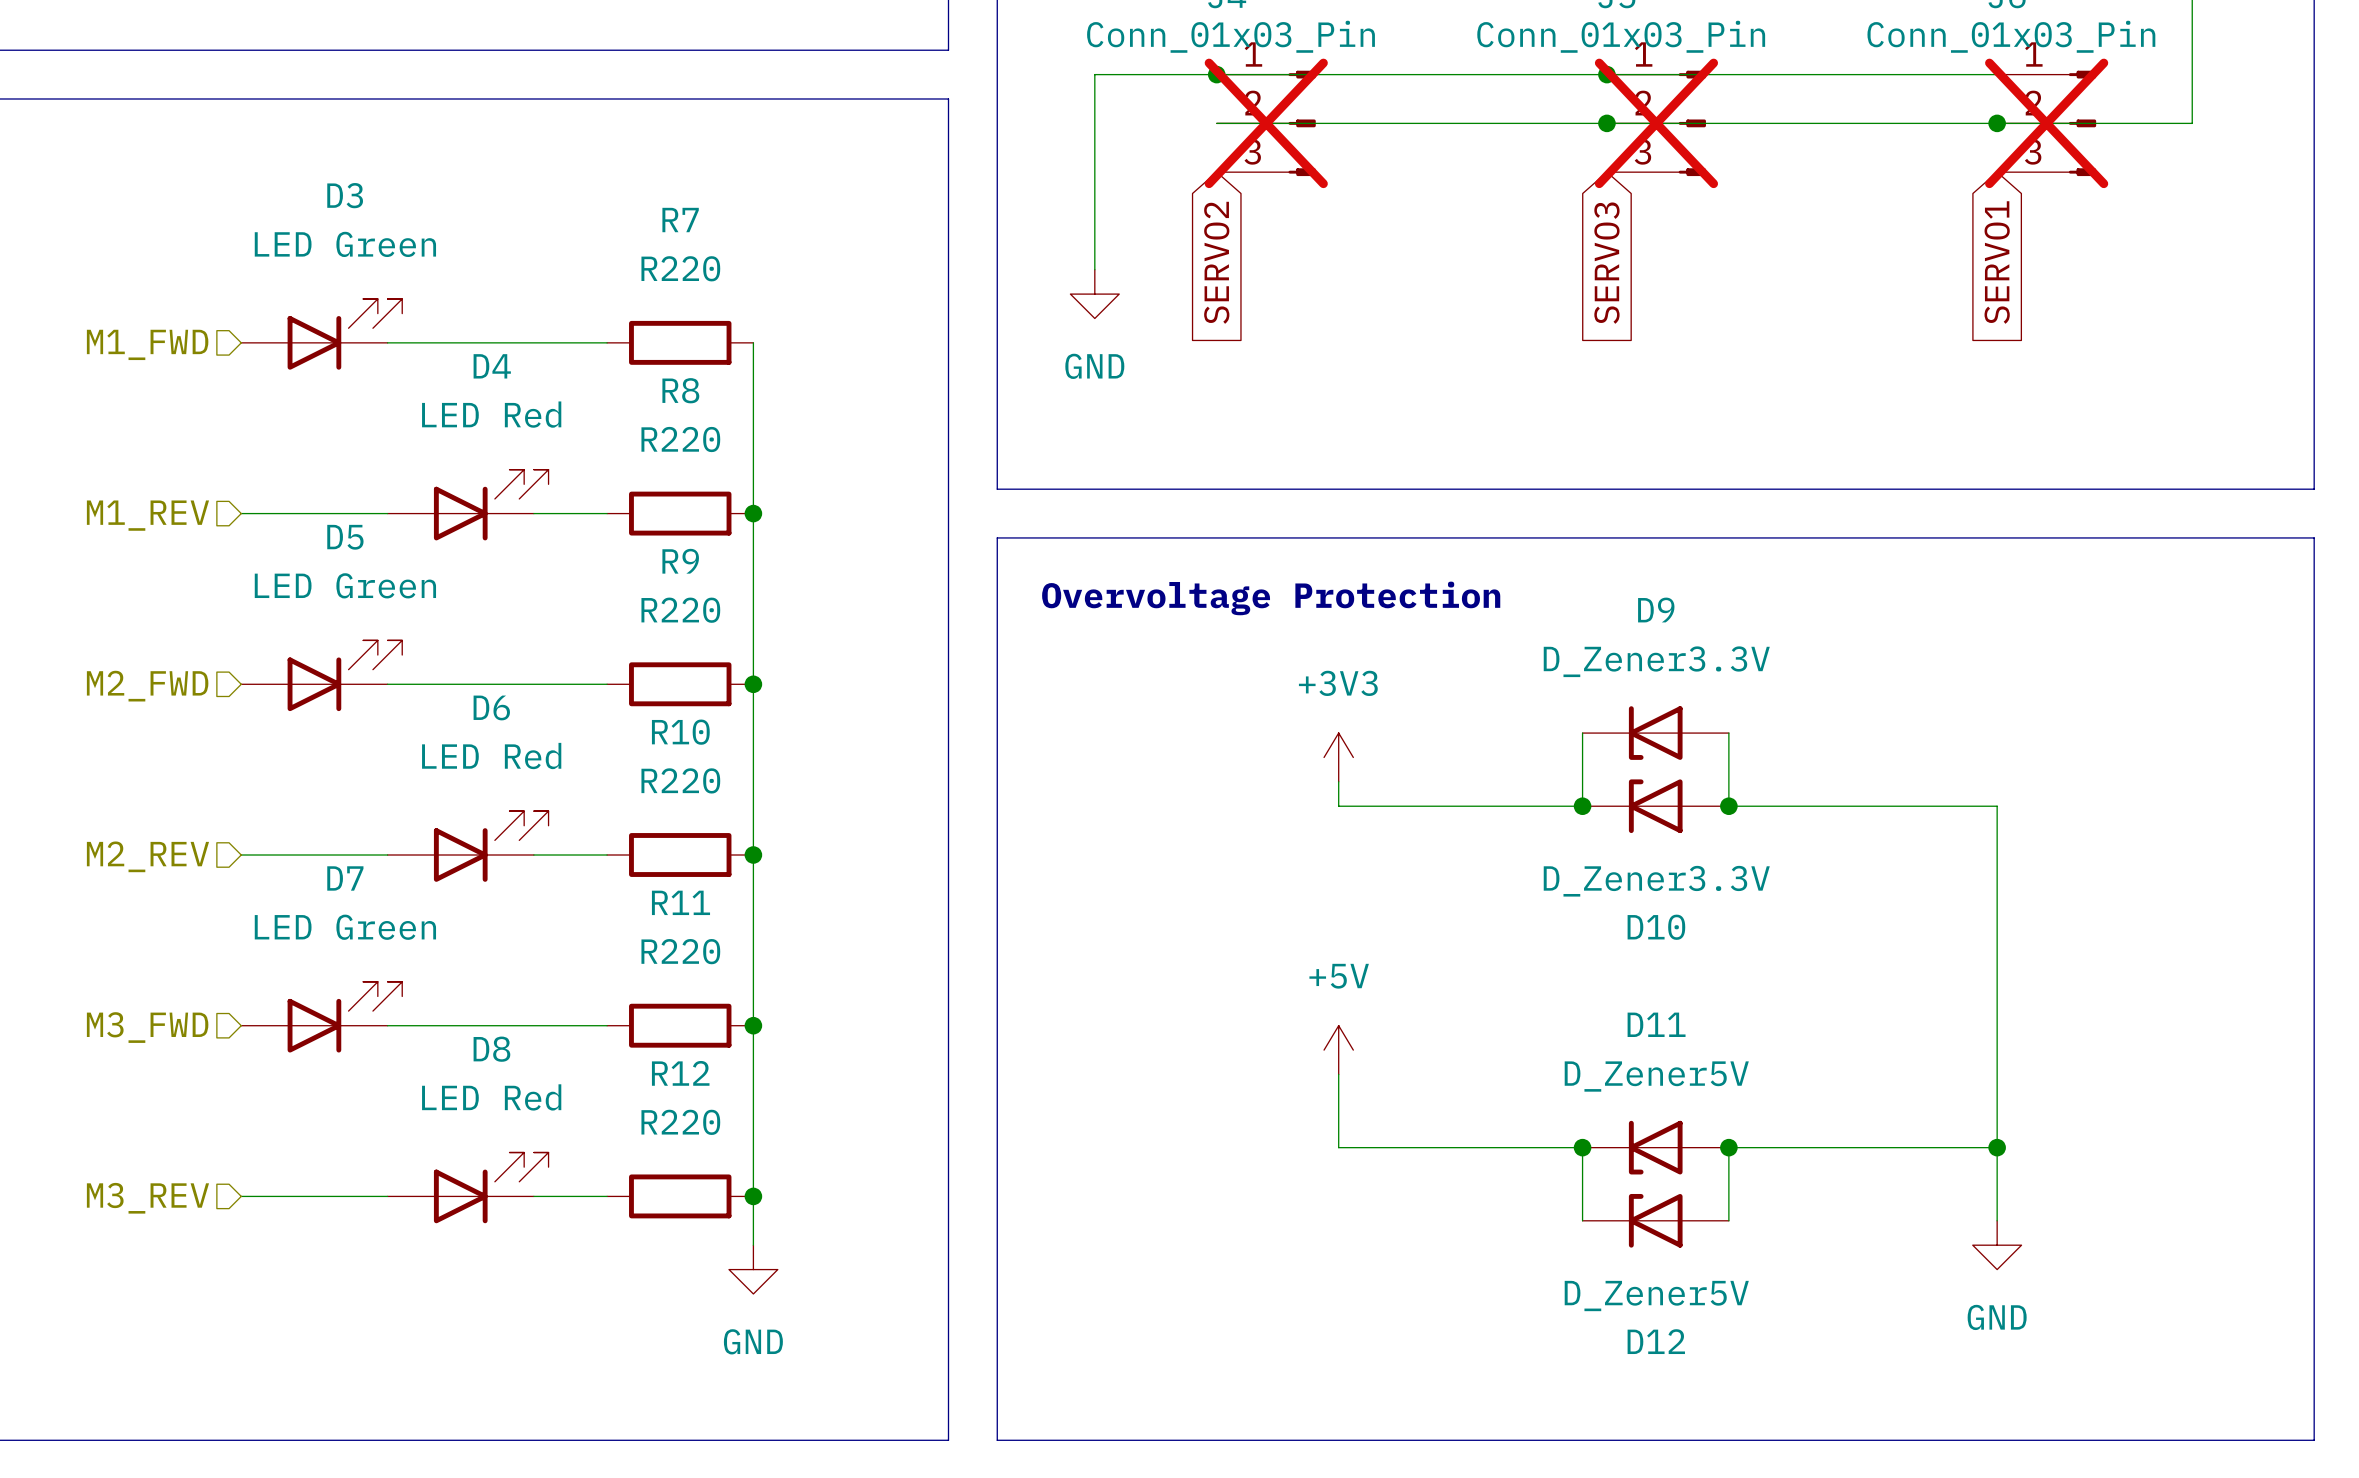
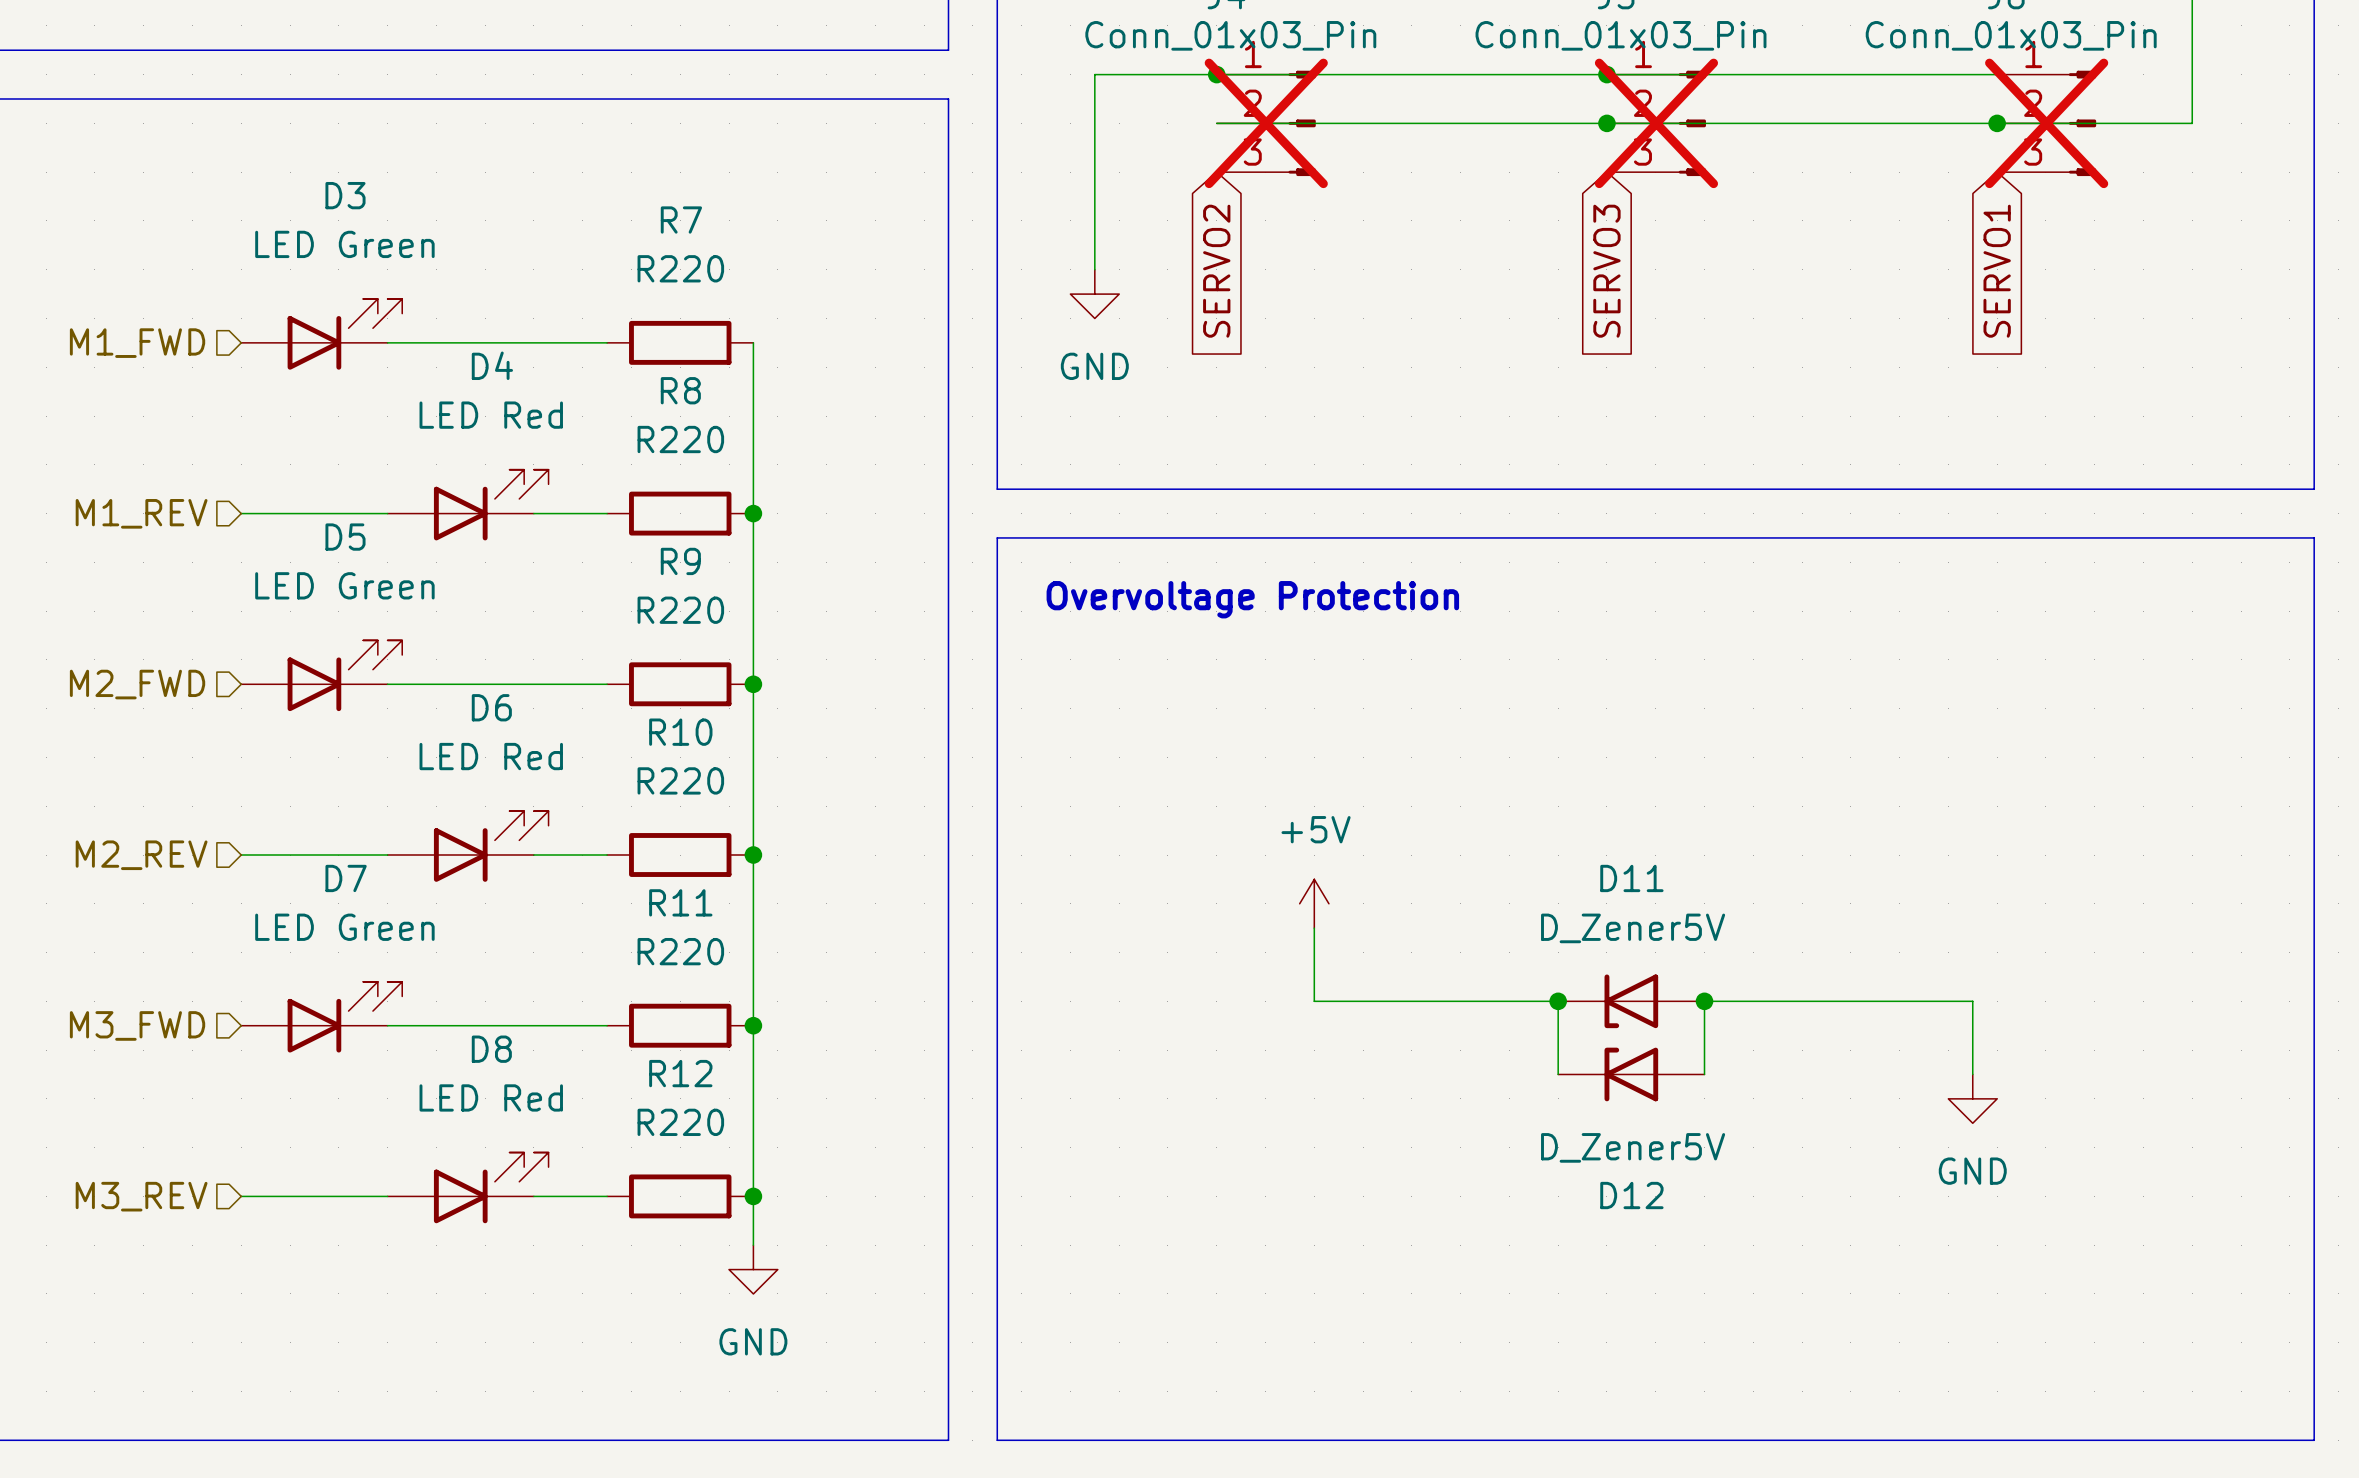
wire: (1582, 733) (1582, 806) (1338, 806) (1338, 781) -> none
D9: D_Zener3.3V (1655, 733) -> none
wire: (1728, 733) (1728, 806) (1997, 806) (1997, 1220) -> none
power symbol: +3V3 (1338, 757) -> none
junction: (1582, 806) -> none
D10: D_Zener3.3V (1655, 806) -> none
junction: (1728, 806) -> none
junction: none -> (1558, 1001)
junction: none -> (1704, 1001)
power symbol position: +5V (1338, 1050) -> +5V (1314, 903)
wire: (1338, 1074) (1338, 1147) (1582, 1147) (1582, 1220) -> (1314, 928) (1314, 1001) (1558, 1001) (1558, 1074)
wire: none -> (1704, 1074) (1704, 1001) (1972, 1001) (1972, 1074)
junction: (1582, 1147) -> none
D11 position: (1655, 1147) -> (1631, 1001)
junction: (1728, 1147) -> none
wire: (1997, 1147) (1728, 1147) (1728, 1220) -> none
junction: (1997, 1147) -> none
D12 position: (1655, 1220) -> (1631, 1074)
power symbol position: GND (1997, 1245) -> GND (1972, 1098)

